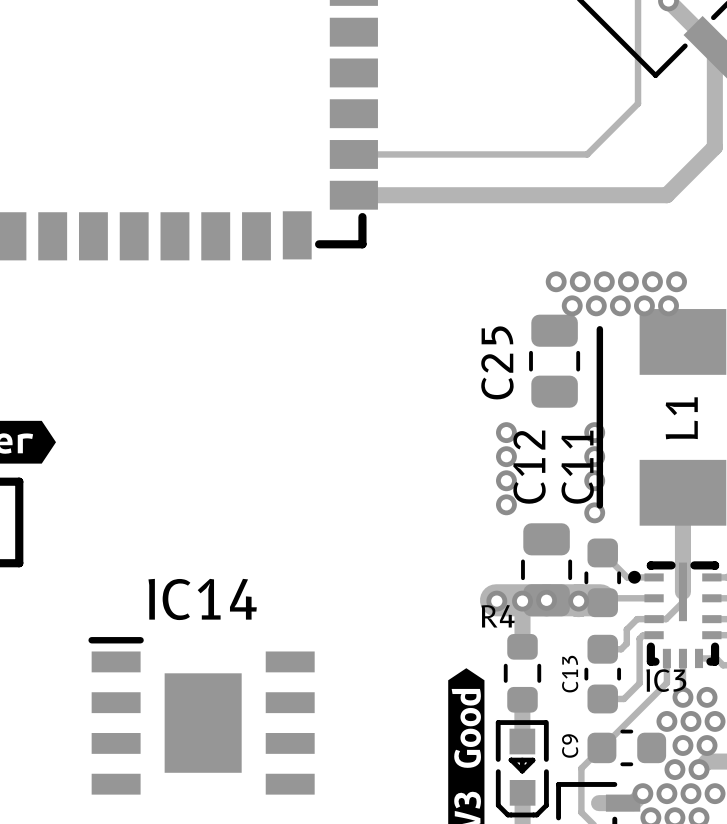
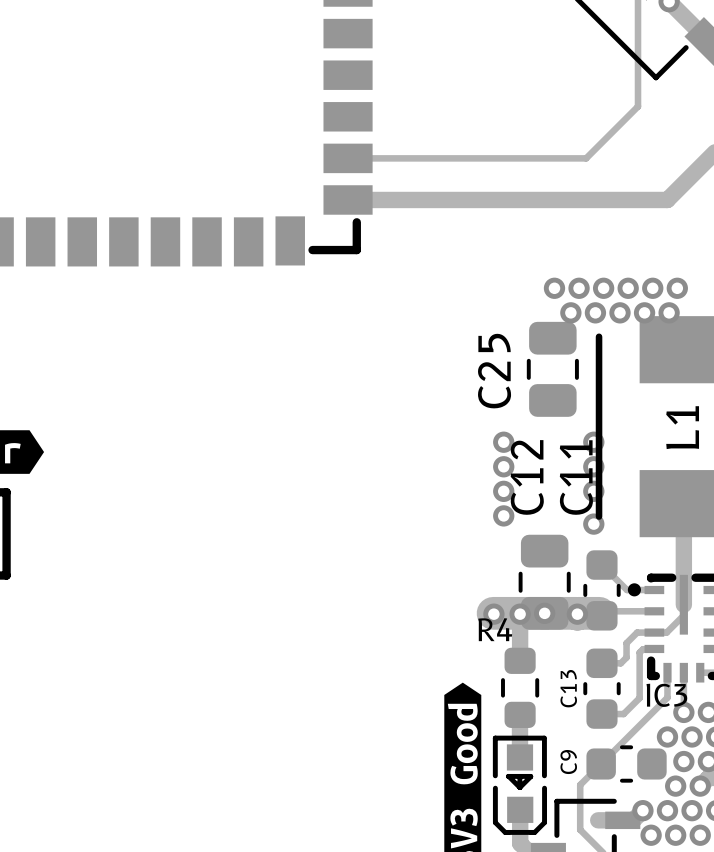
IC14: (201, 715) -> none

